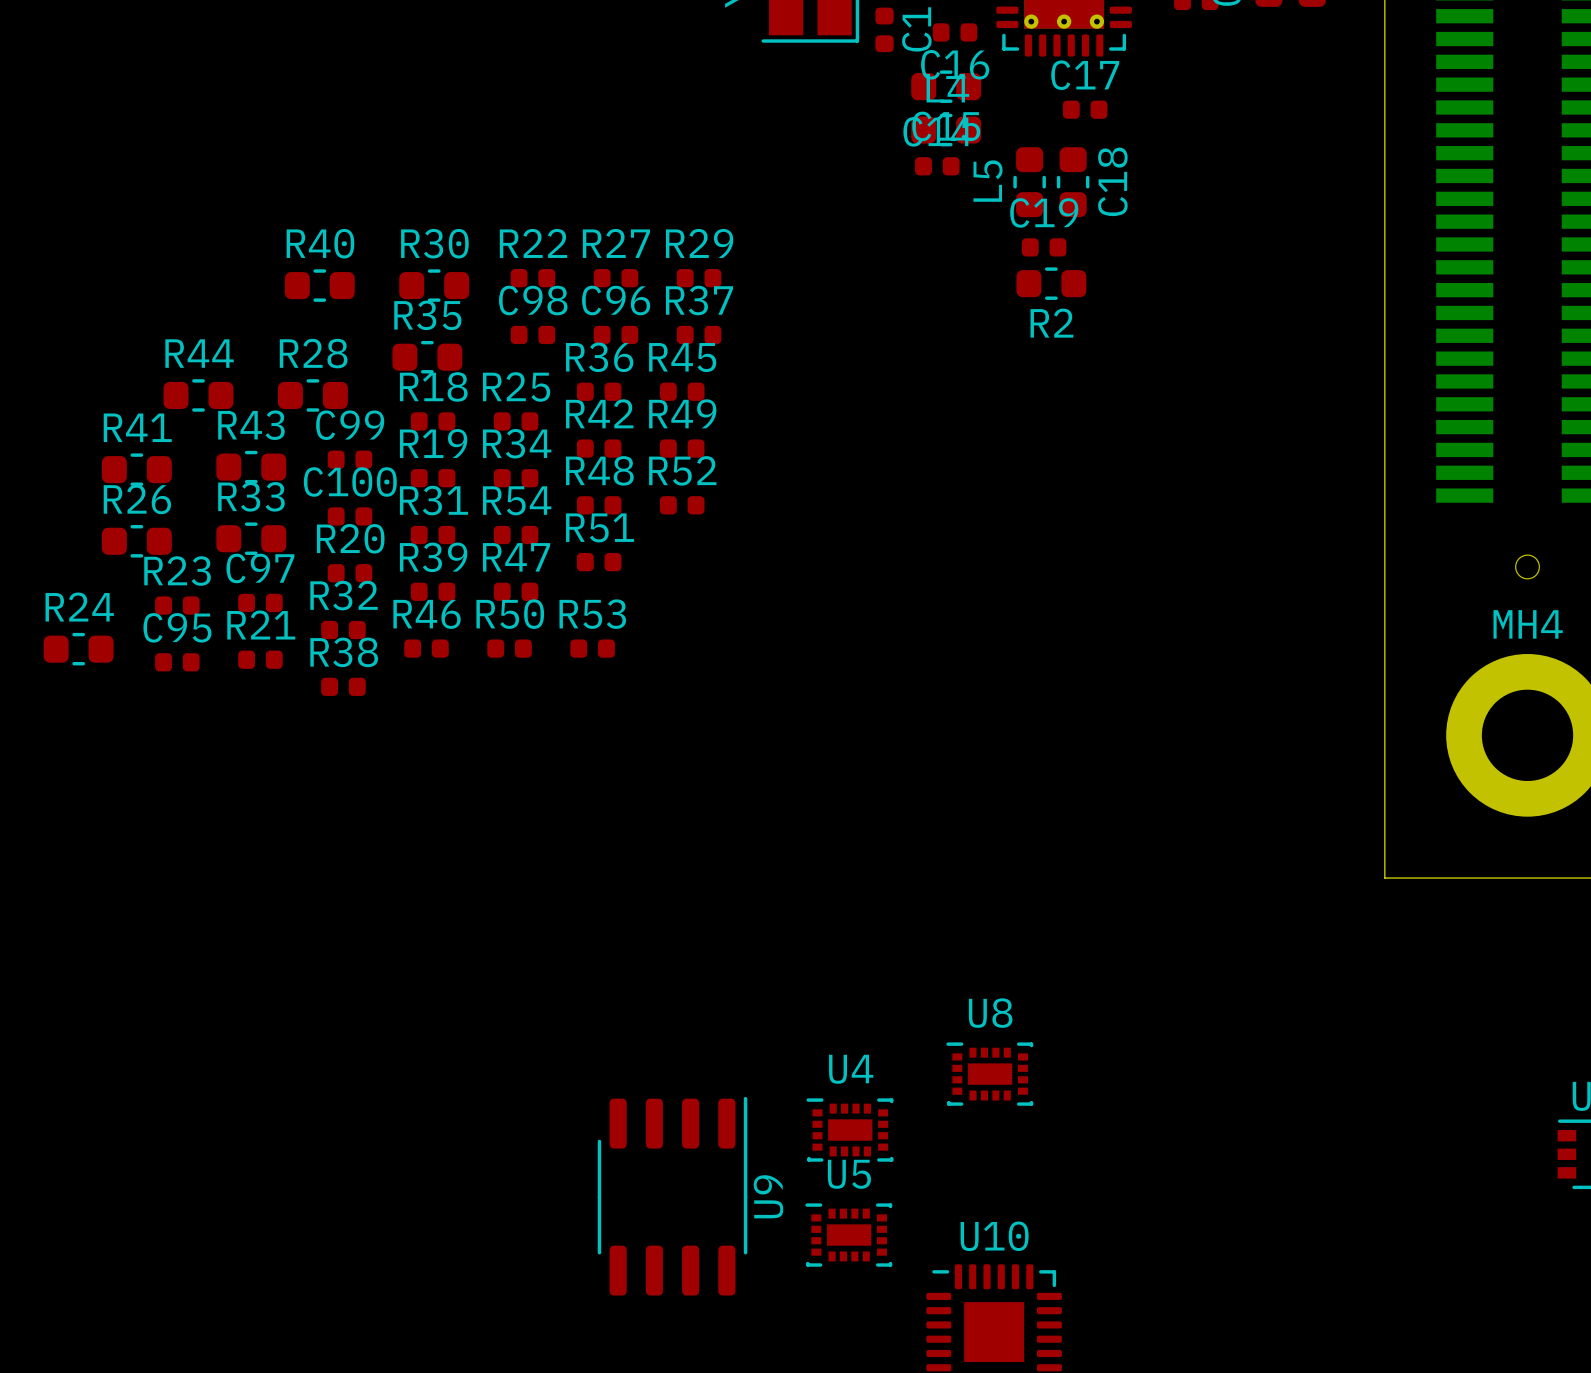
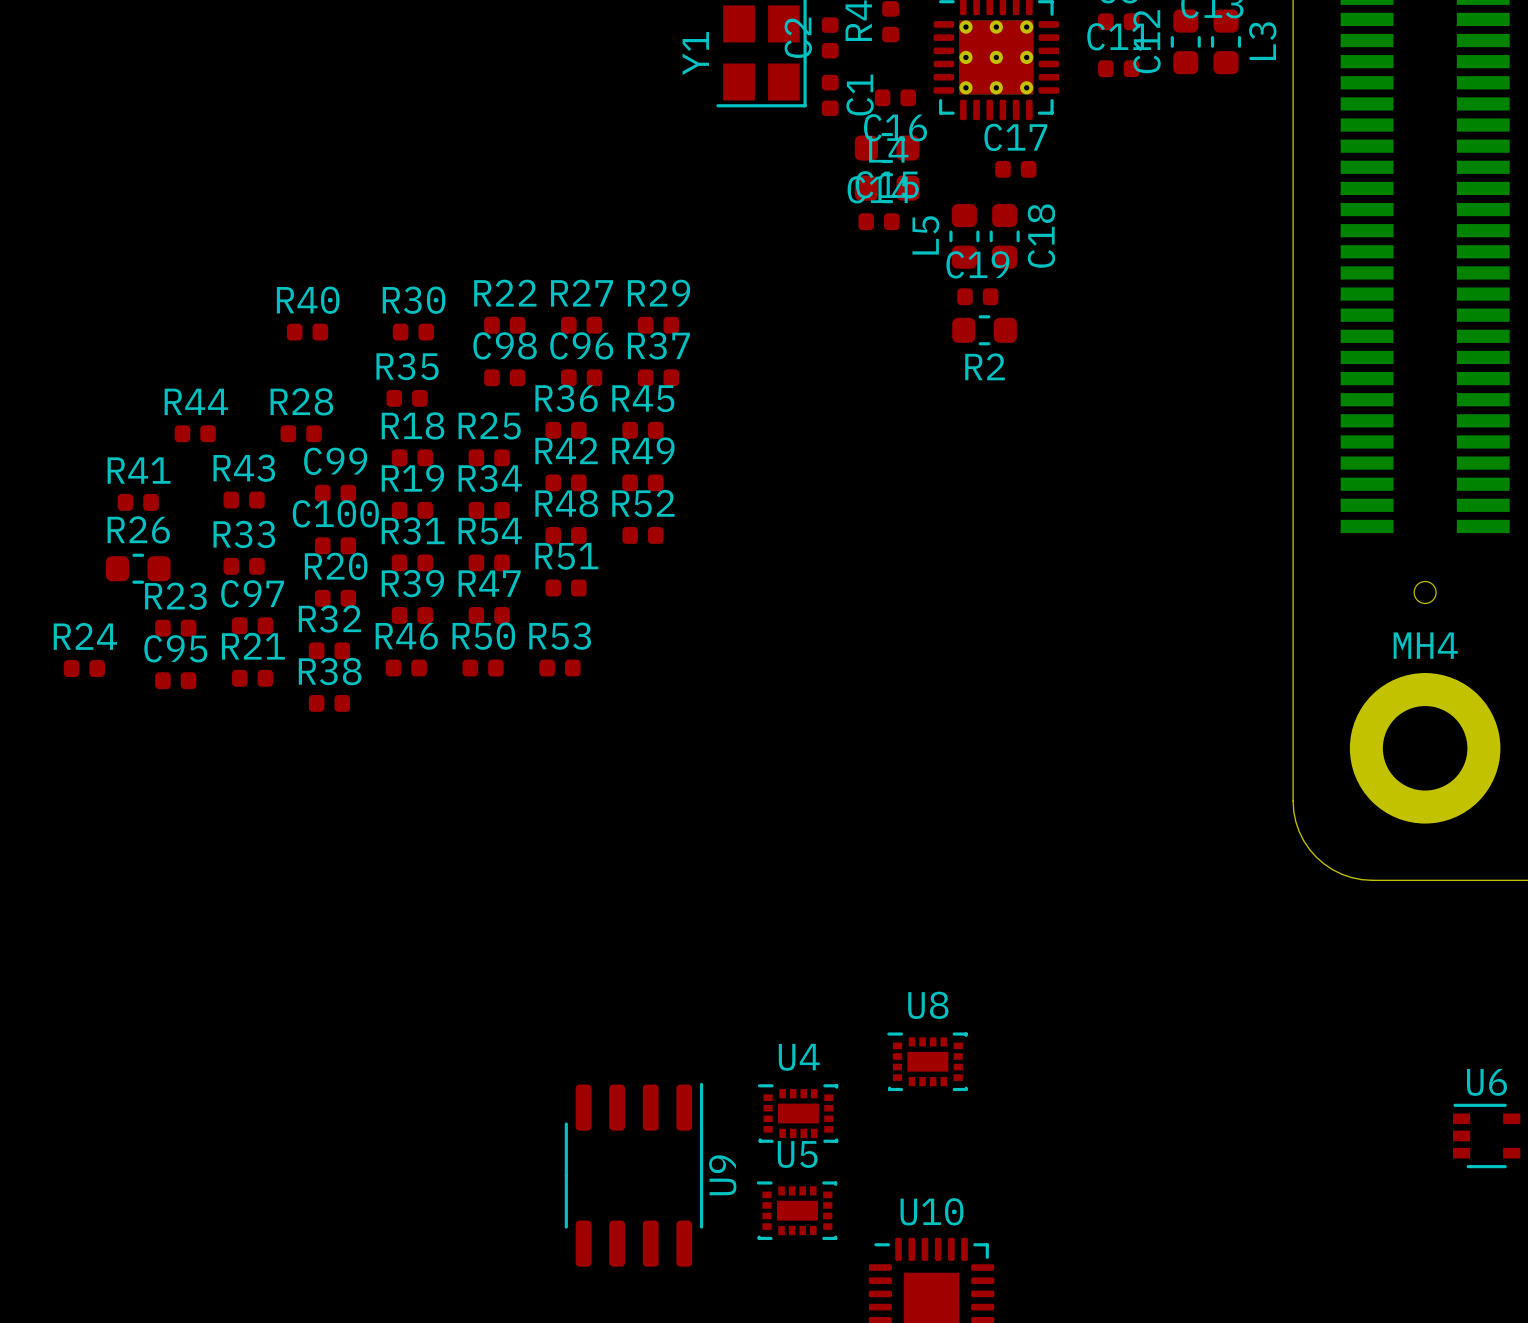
R40 footprint: [284, 269, 355, 302] -> [286, 323, 329, 341]
R30 footprint: [399, 269, 470, 302] -> [392, 323, 435, 341]
R35 footprint: [392, 340, 463, 374] -> [386, 389, 428, 407]
R44 footprint: [163, 379, 234, 412] -> [174, 425, 216, 443]
R28 footprint: [277, 379, 348, 412] -> [280, 425, 322, 443]
R43 footprint: [216, 450, 287, 484] -> [223, 491, 265, 509]
R41 footprint: [101, 453, 172, 486] -> [117, 493, 159, 511]
R33 footprint: [216, 522, 287, 555] -> [223, 557, 265, 575]
R24 footprint: [43, 632, 114, 666] -> [63, 660, 105, 677]
board edge: (1384, 792) (1384, 878) (1470, 878) -> (1293, 801) (1299, 831) (1316, 857) (1342, 874) (1372, 880)

